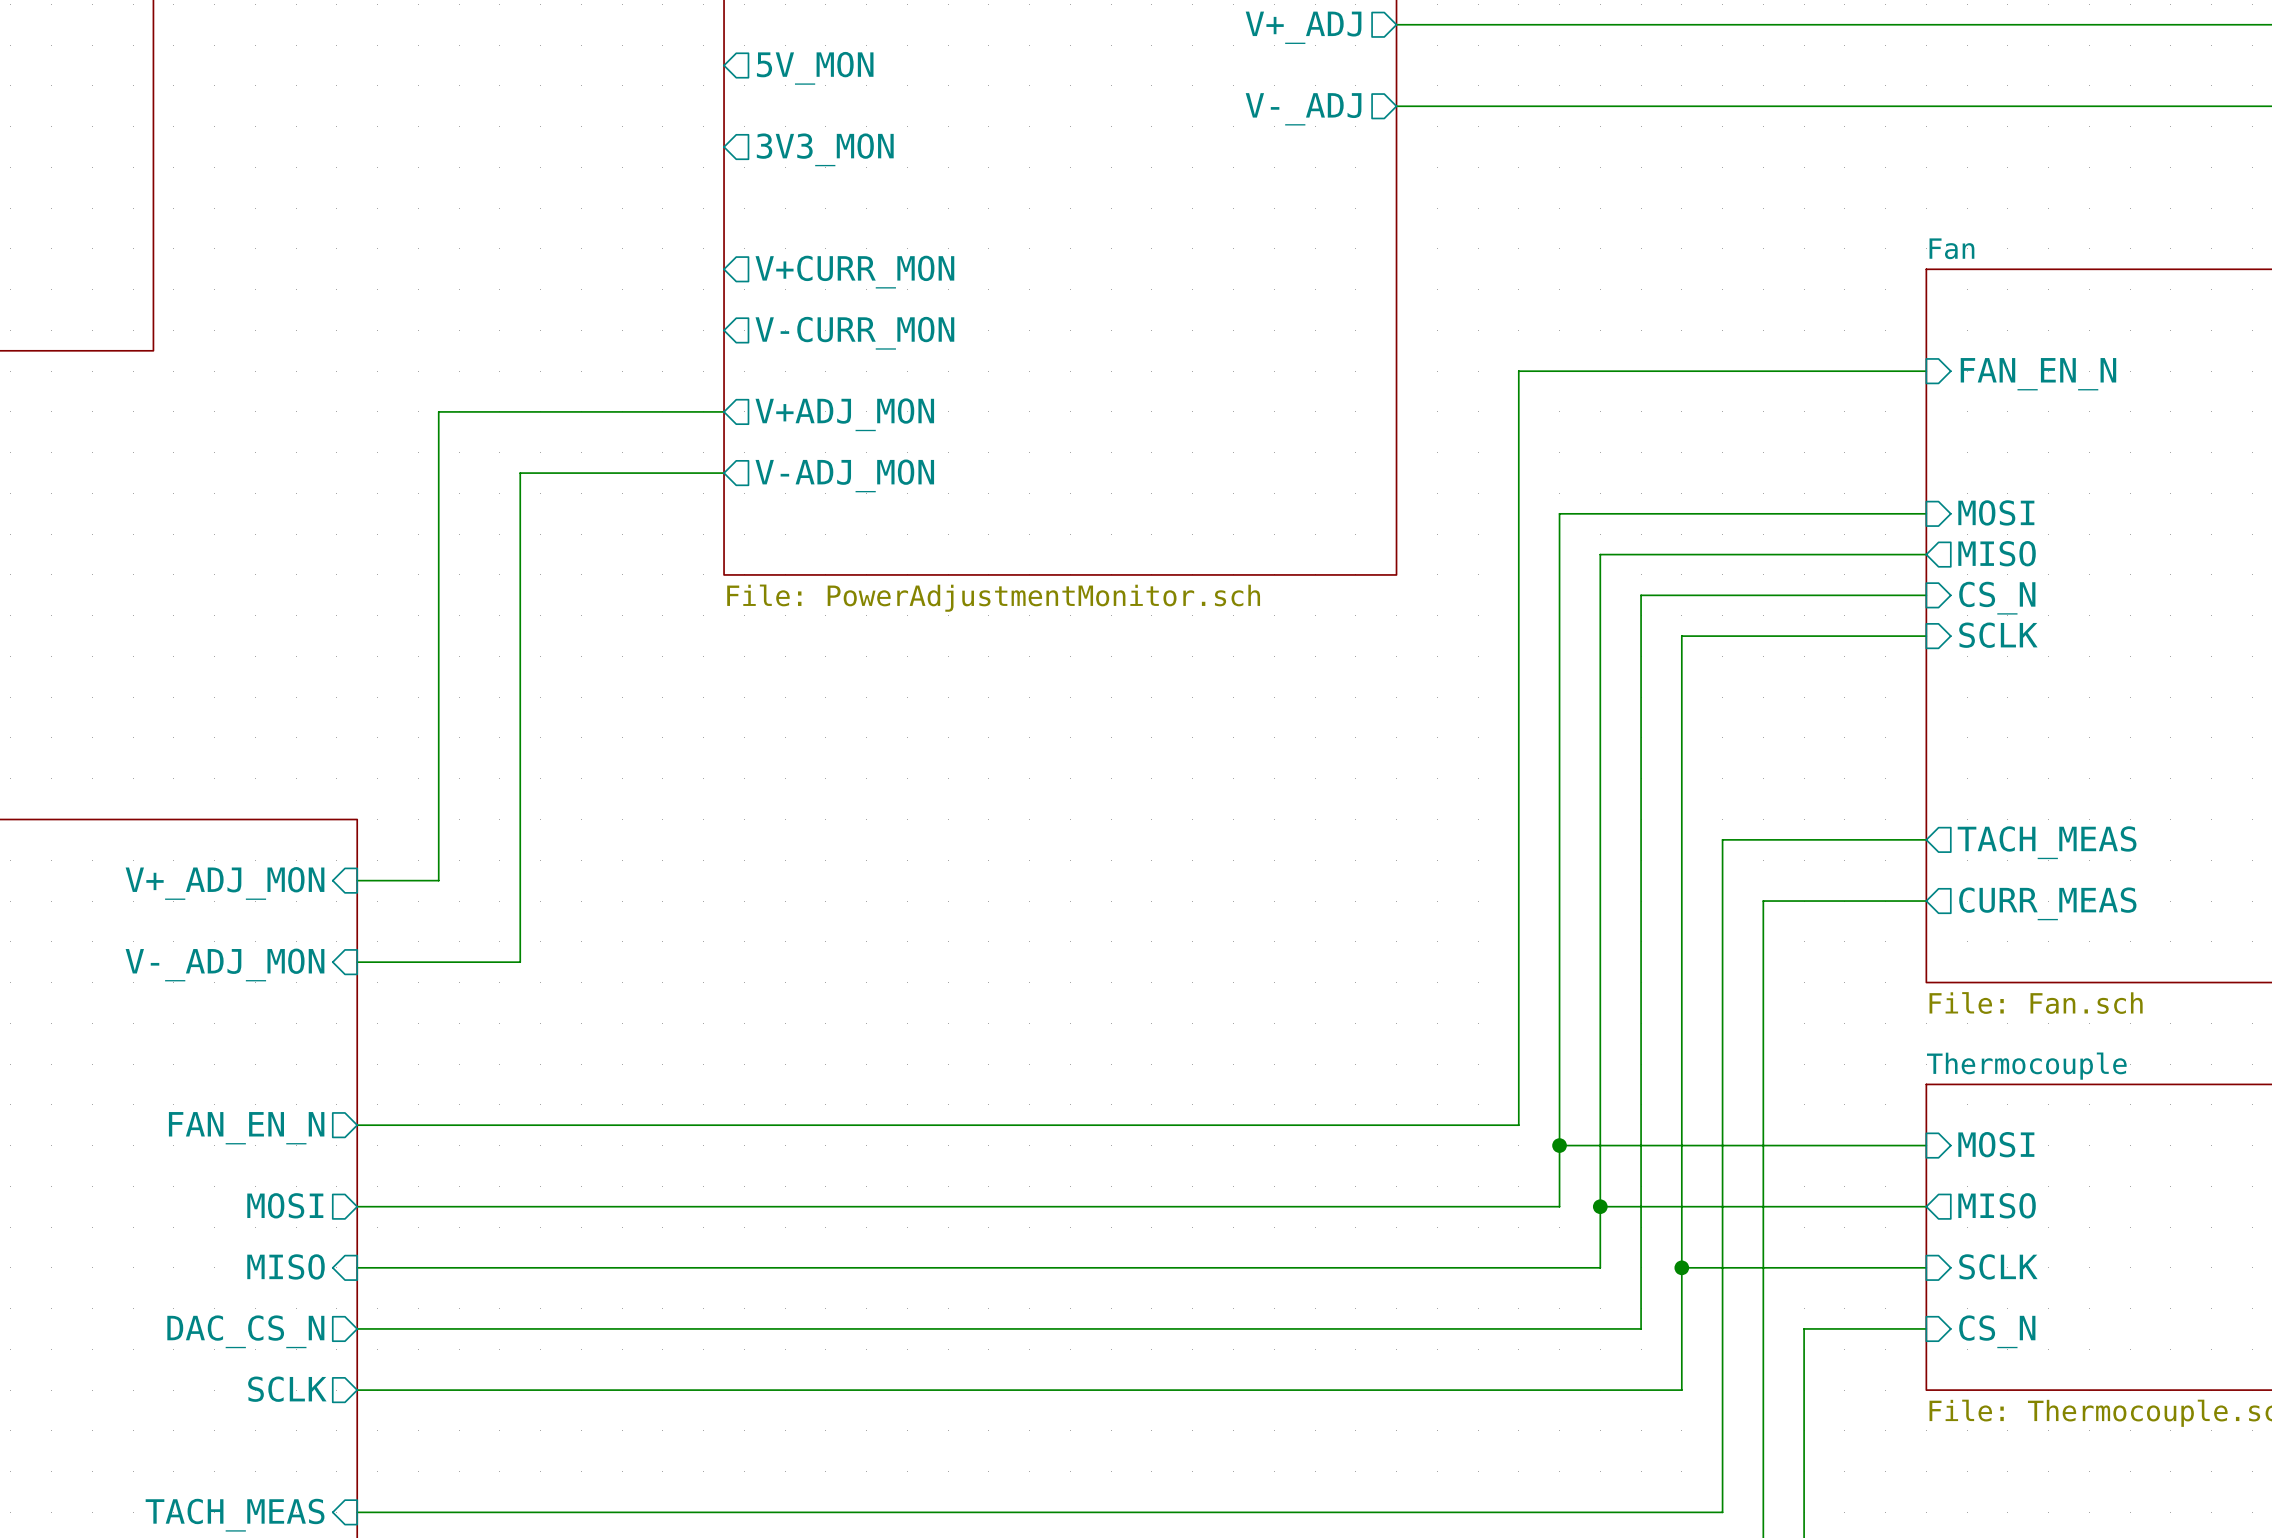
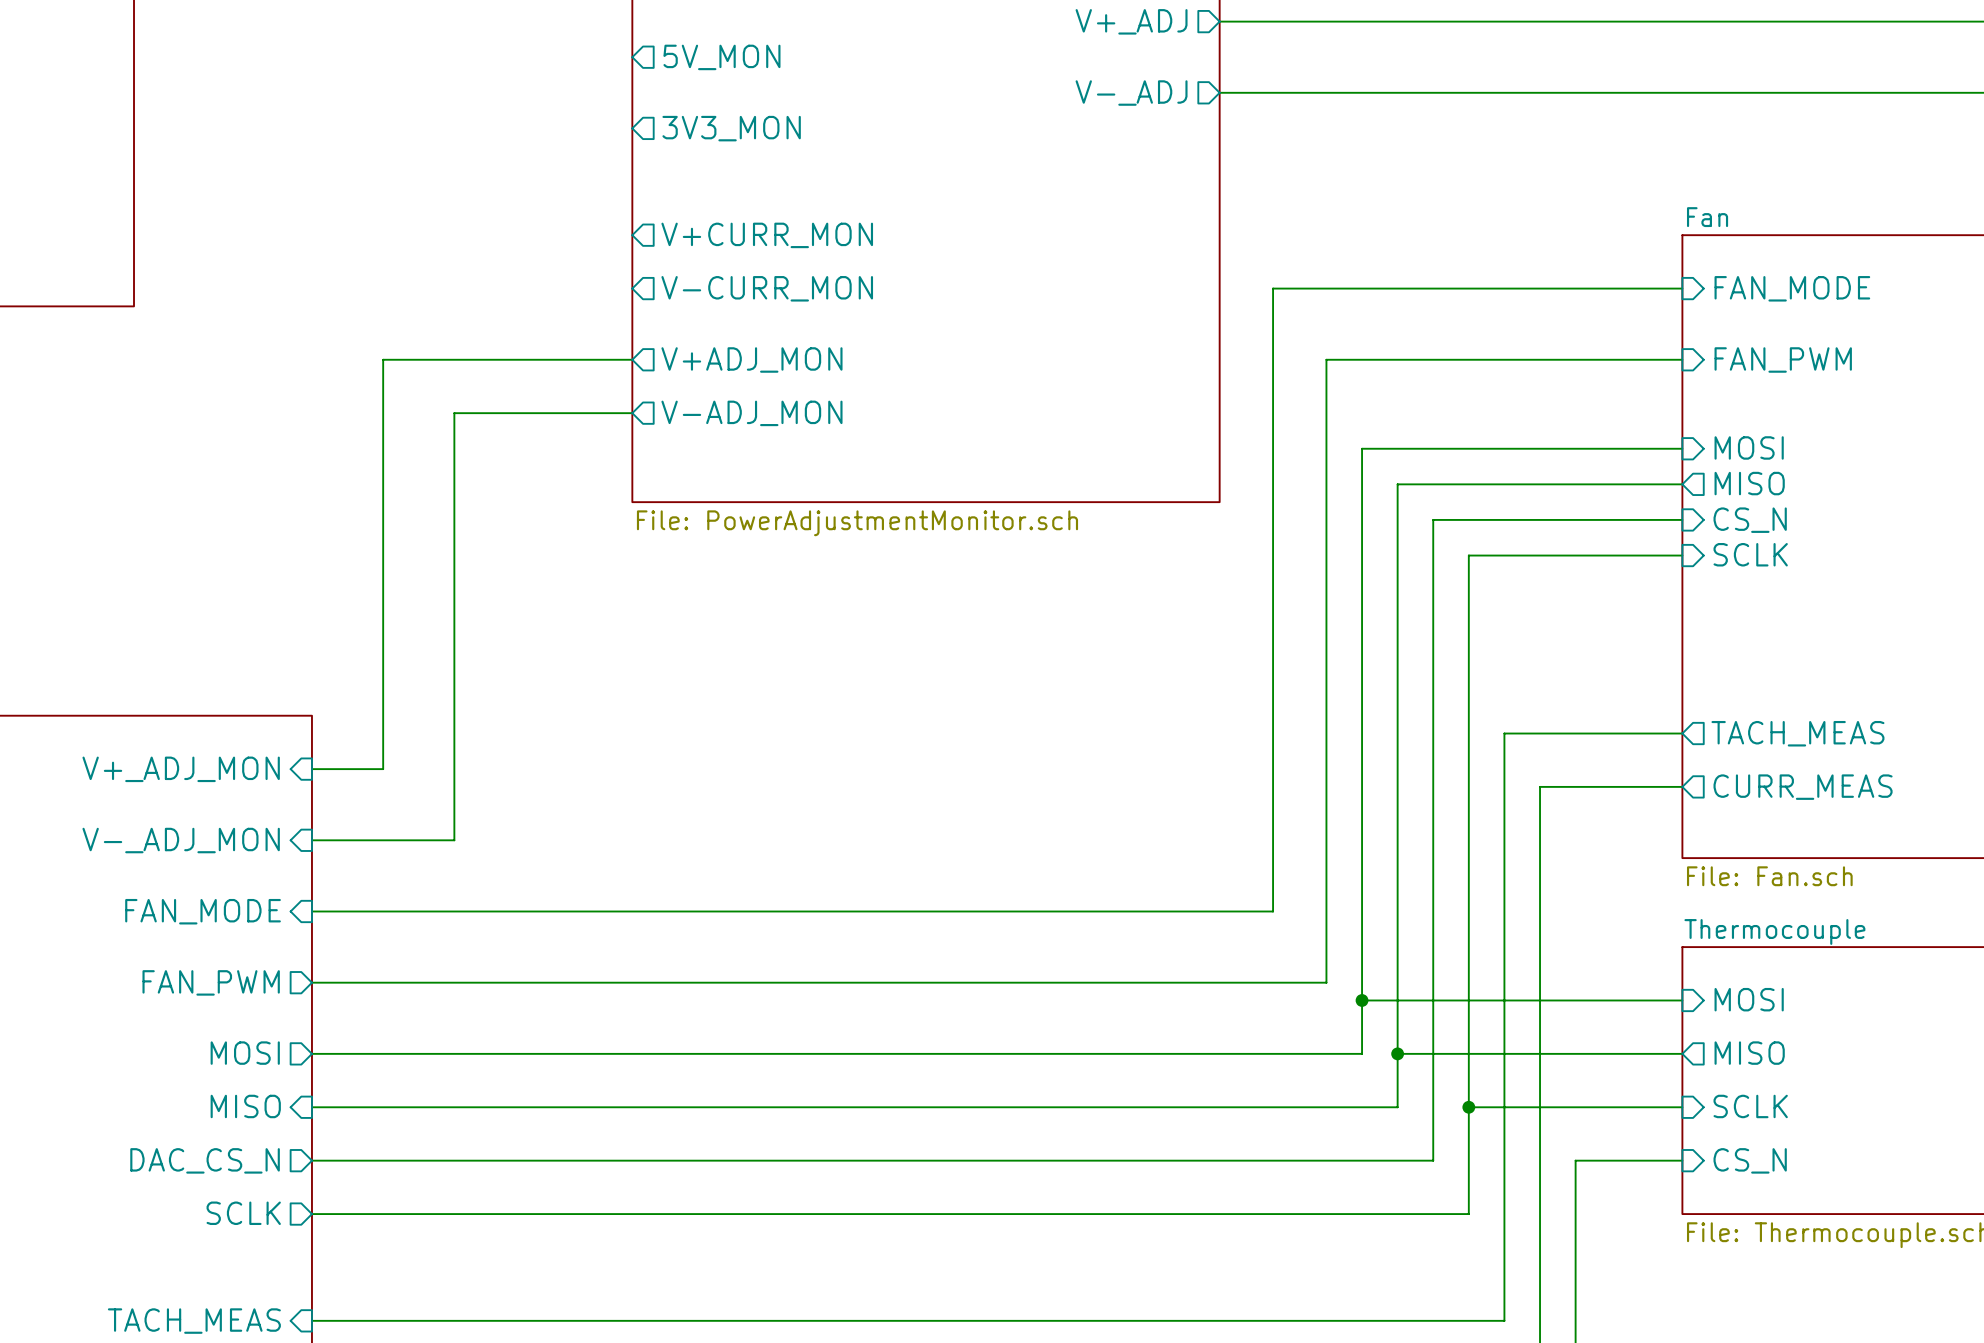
wire: none -> (1682, 288) (1273, 288) (1273, 911) (311, 911)
wire: (1926, 371) (1518, 371) (1518, 411) -> (1682, 359) (1326, 359)
sheet pin: FAN_EN_N (2038, 374) -> FAN_MODE (1792, 288)
sheet pin: none -> FAN_PWM (1783, 359)
sheet pin: none -> FAN_MODE (203, 911)
sheet pin: FAN_EN_N (246, 1128) -> FAN_PWM (211, 982)

